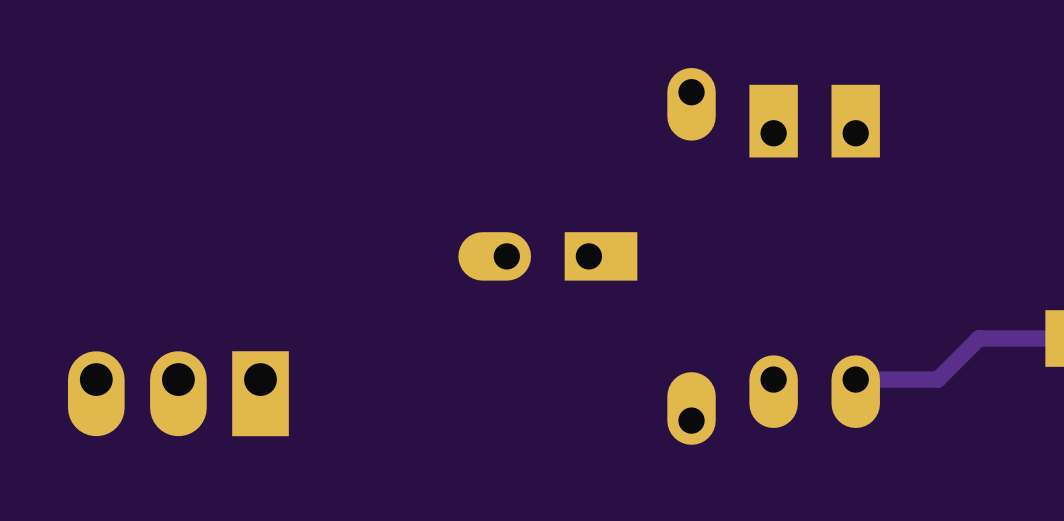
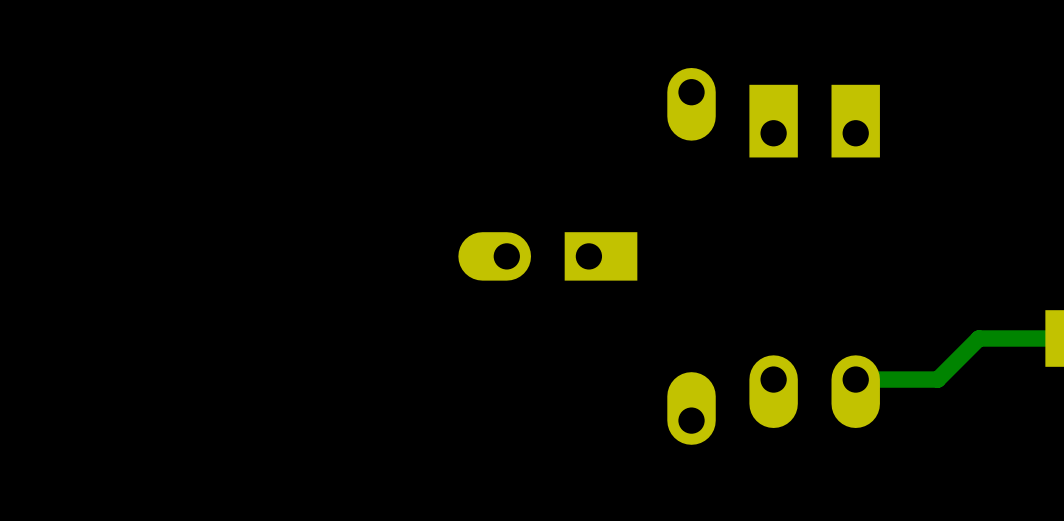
part: (178, 393) -> none

